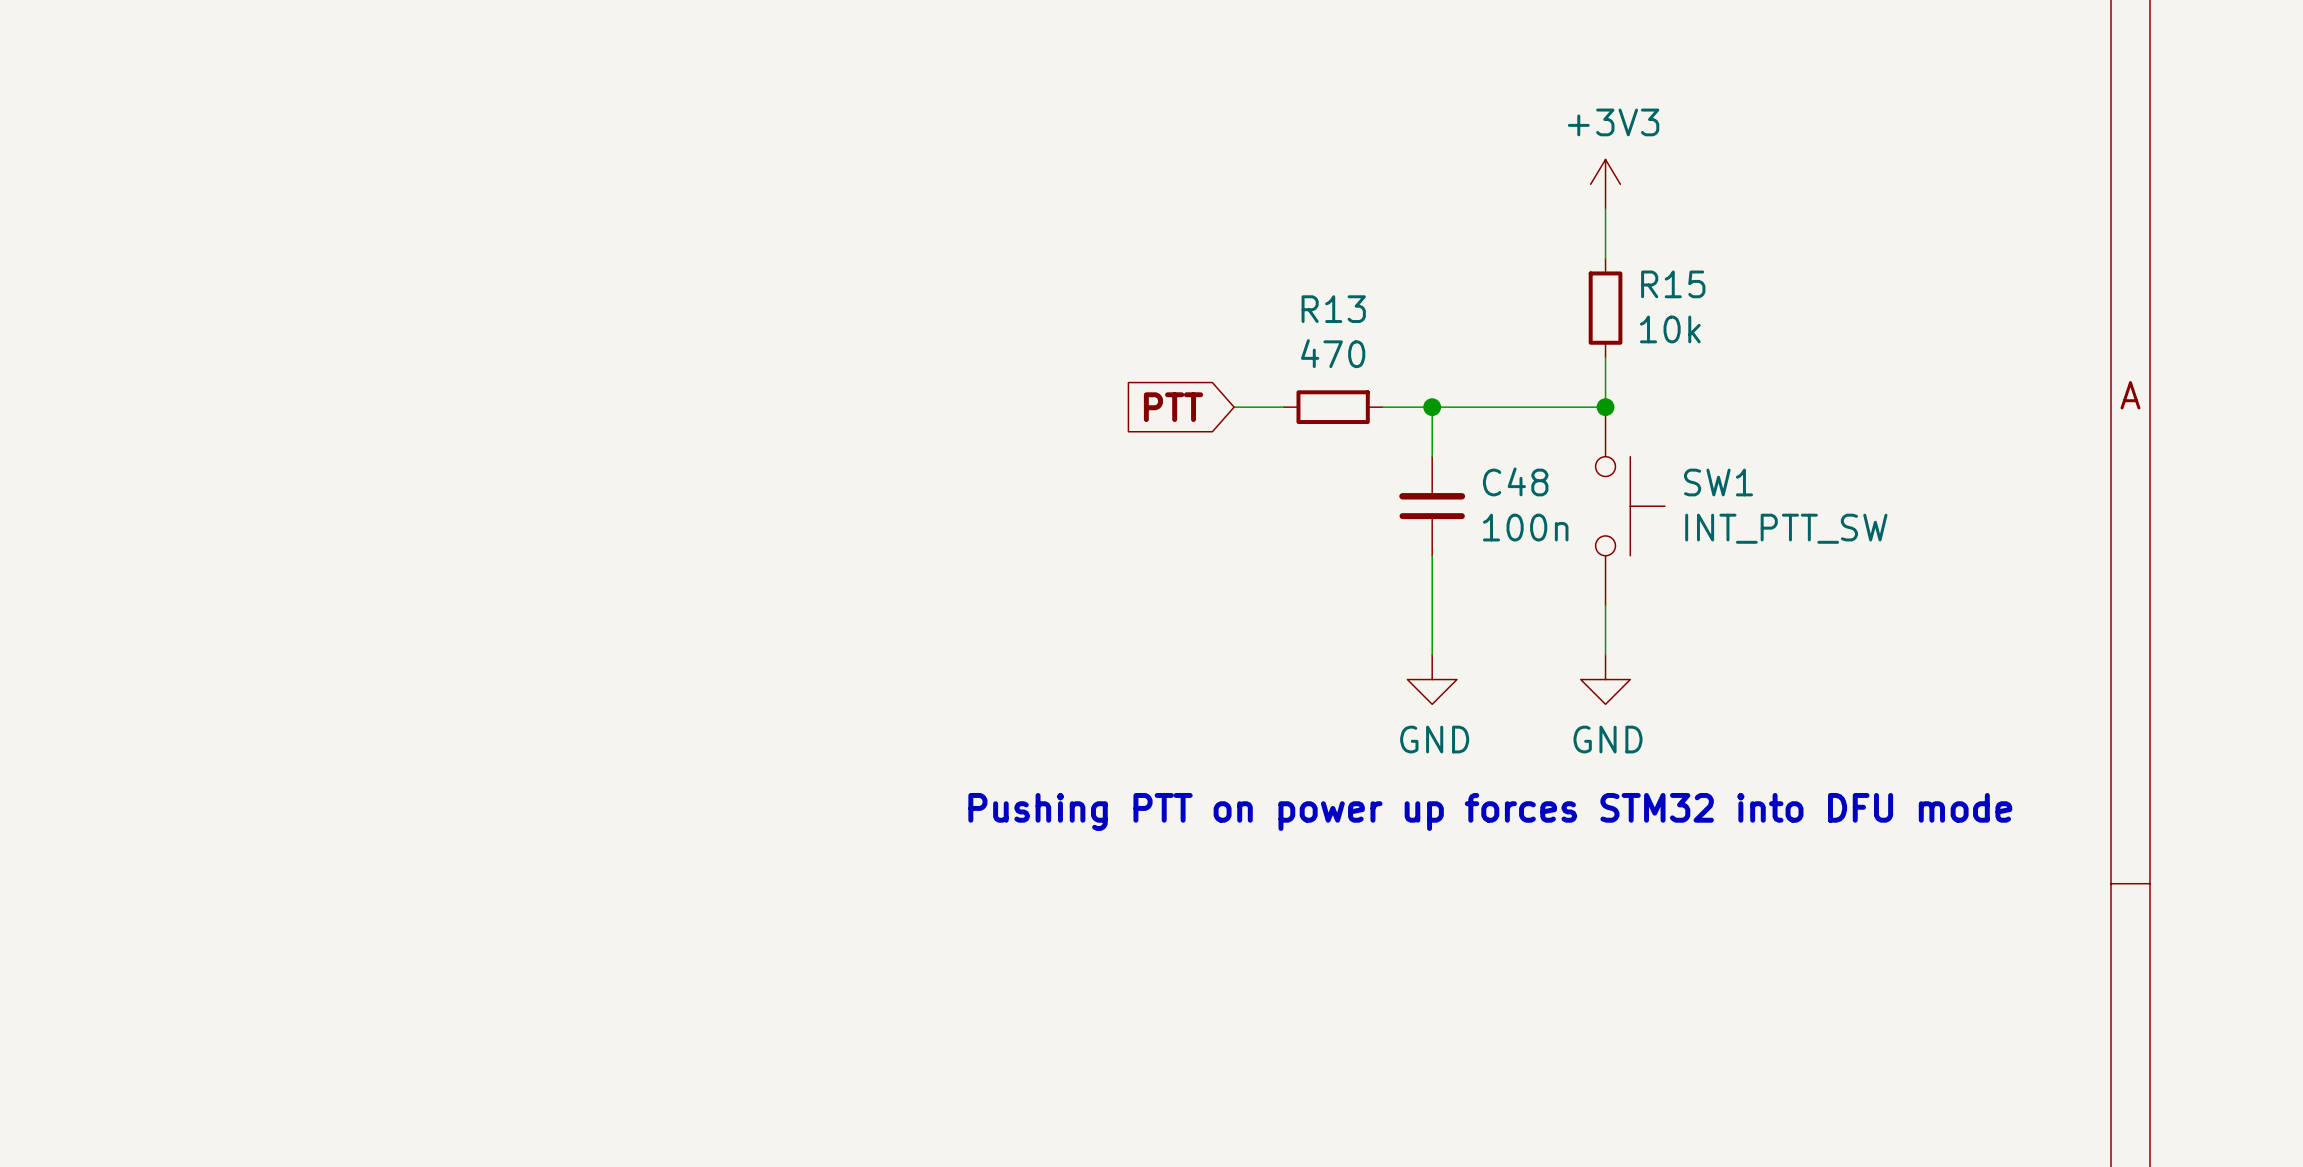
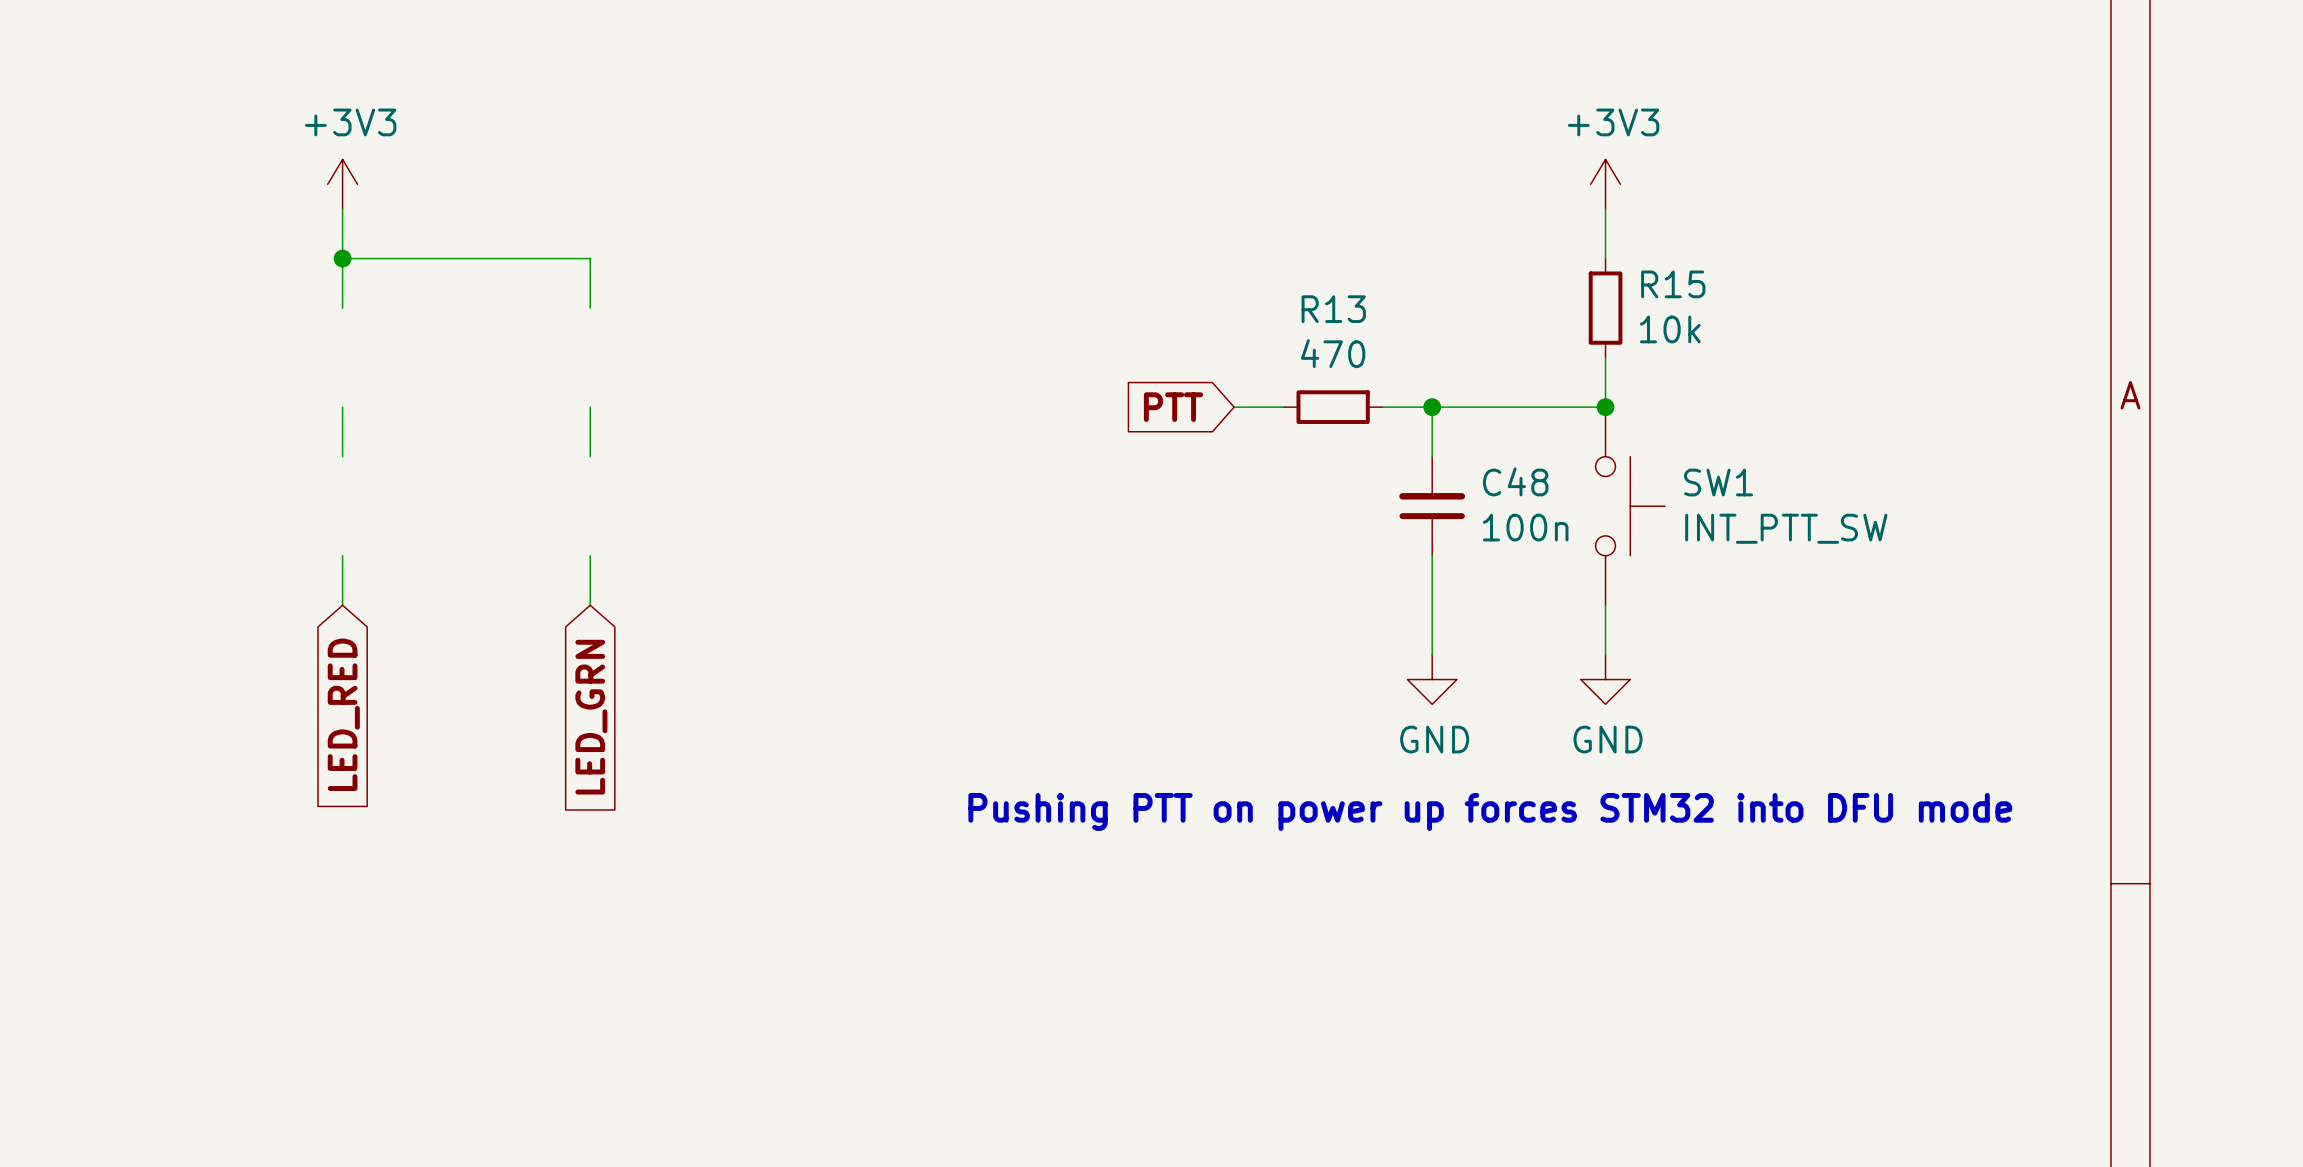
power symbol: none -> +3V3 (342, 184)
wire: none -> (342, 209) (342, 308)
wire: none -> (342, 258) (590, 258) (590, 308)
junction: none -> (342, 258)
wire: none -> (342, 407) (342, 456)
wire: none -> (590, 407) (590, 456)
wire: none -> (342, 555) (342, 605)
wire: none -> (590, 555) (590, 605)
global label: none -> LED_RED (343, 714)
global label: none -> LED_GRN (591, 717)

